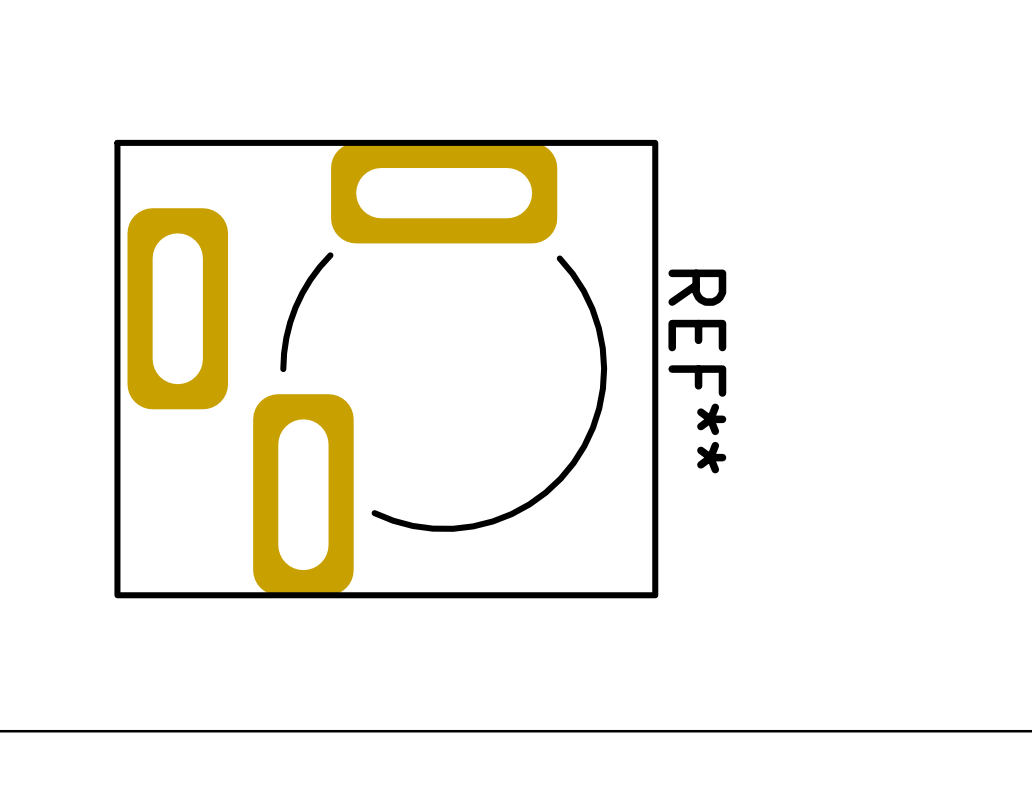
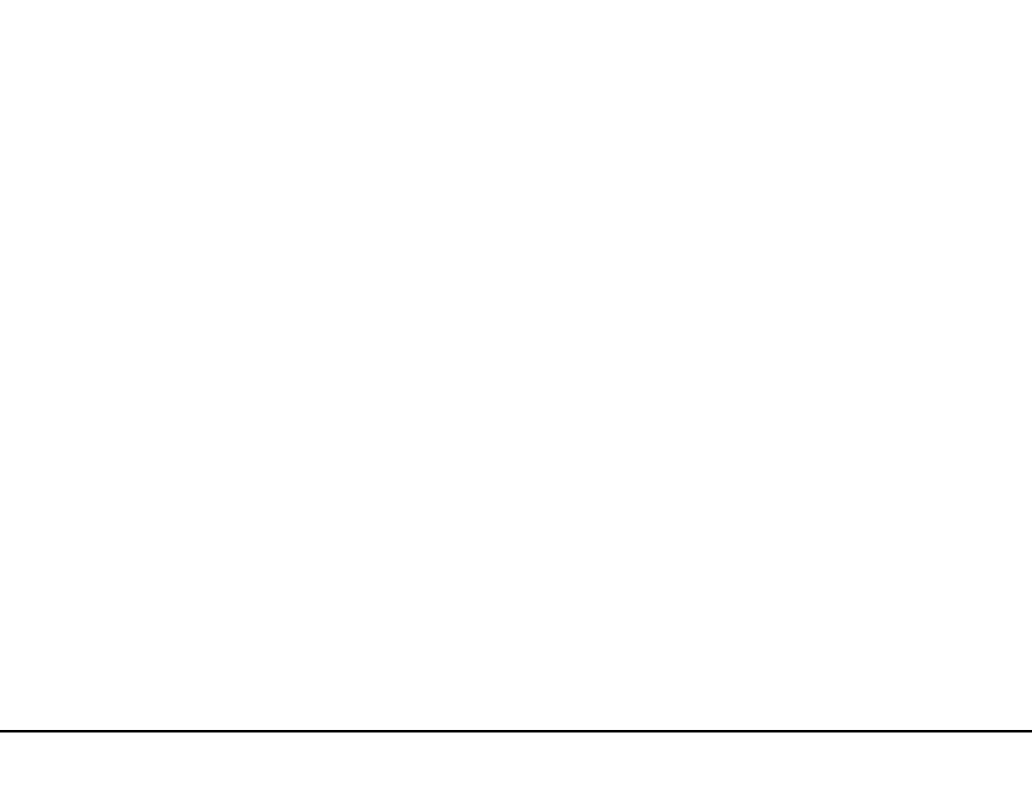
part: (386, 369) -> none

